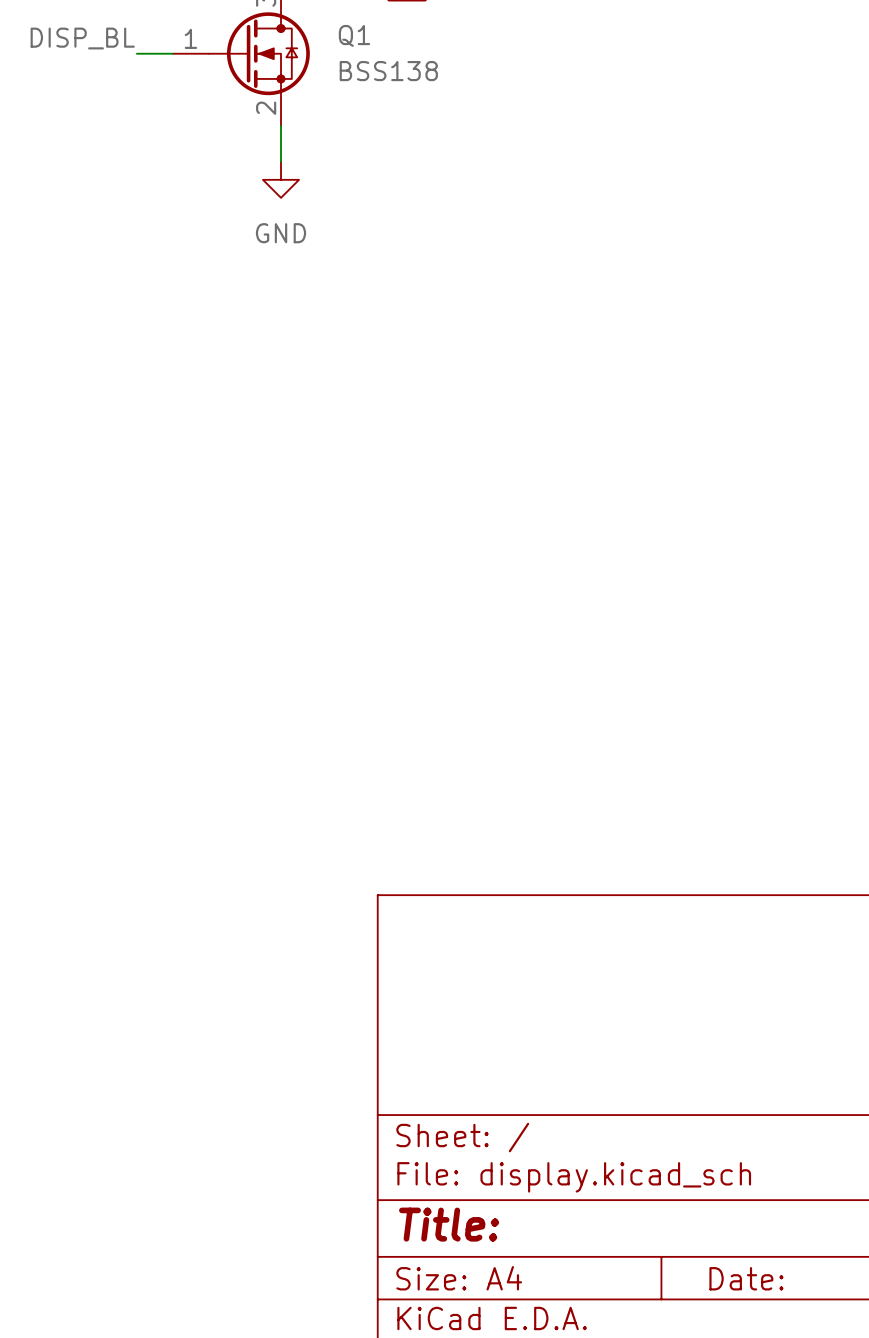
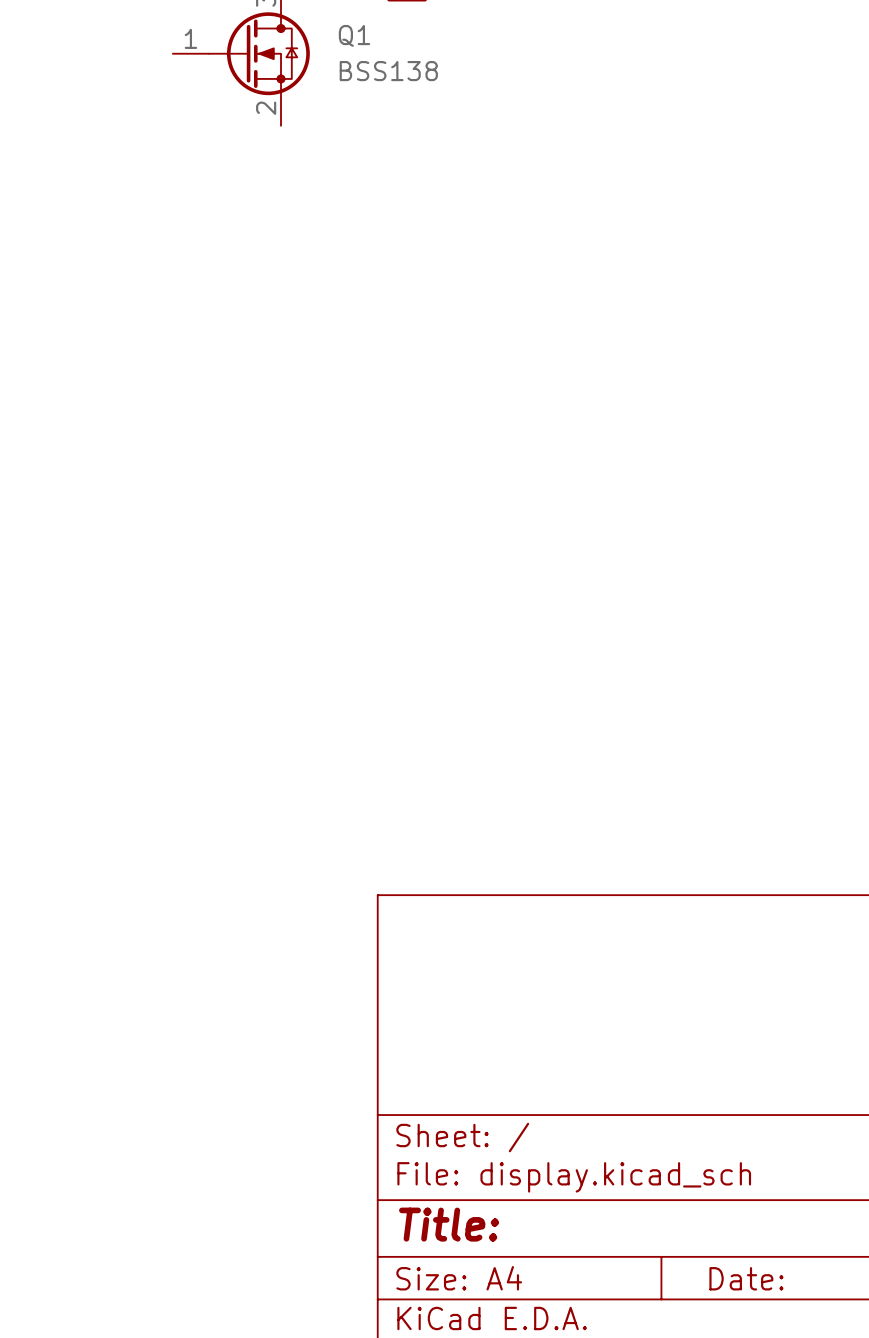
label: DISP_BL (82, 38) -> none
wire: (136, 53) (172, 53) -> none
wire: (281, 125) (281, 161) -> none
power symbol: GND (281, 179) -> none

